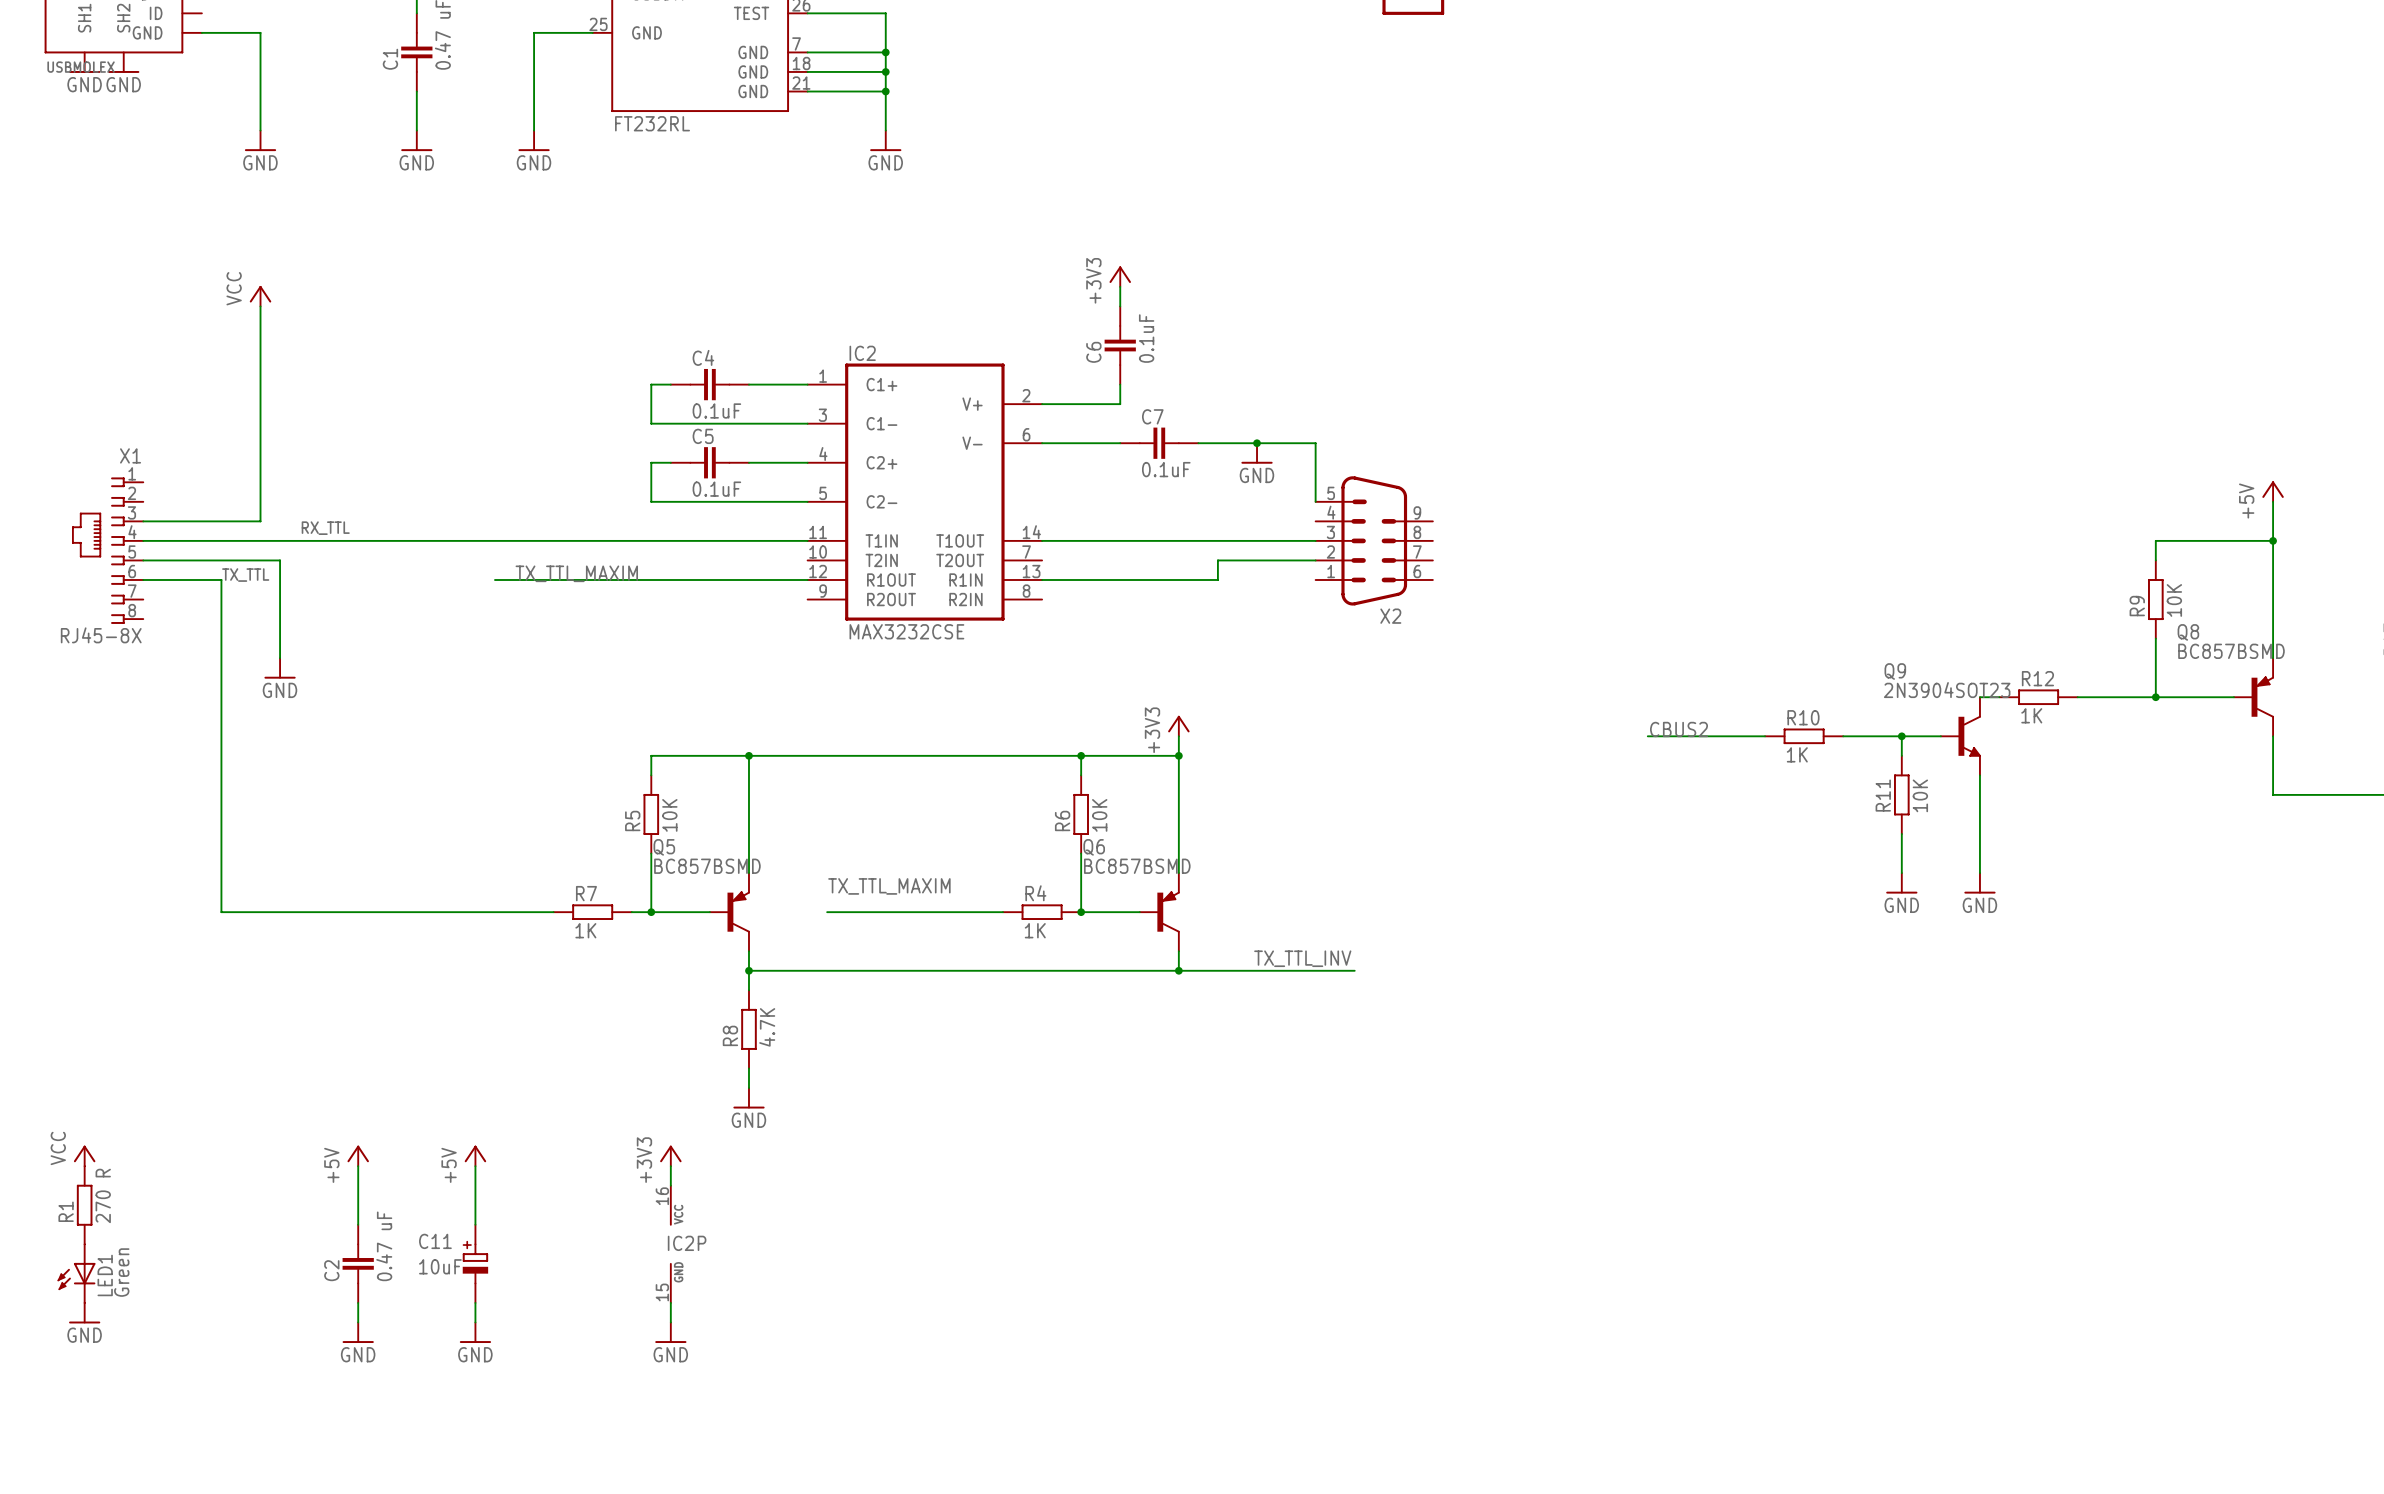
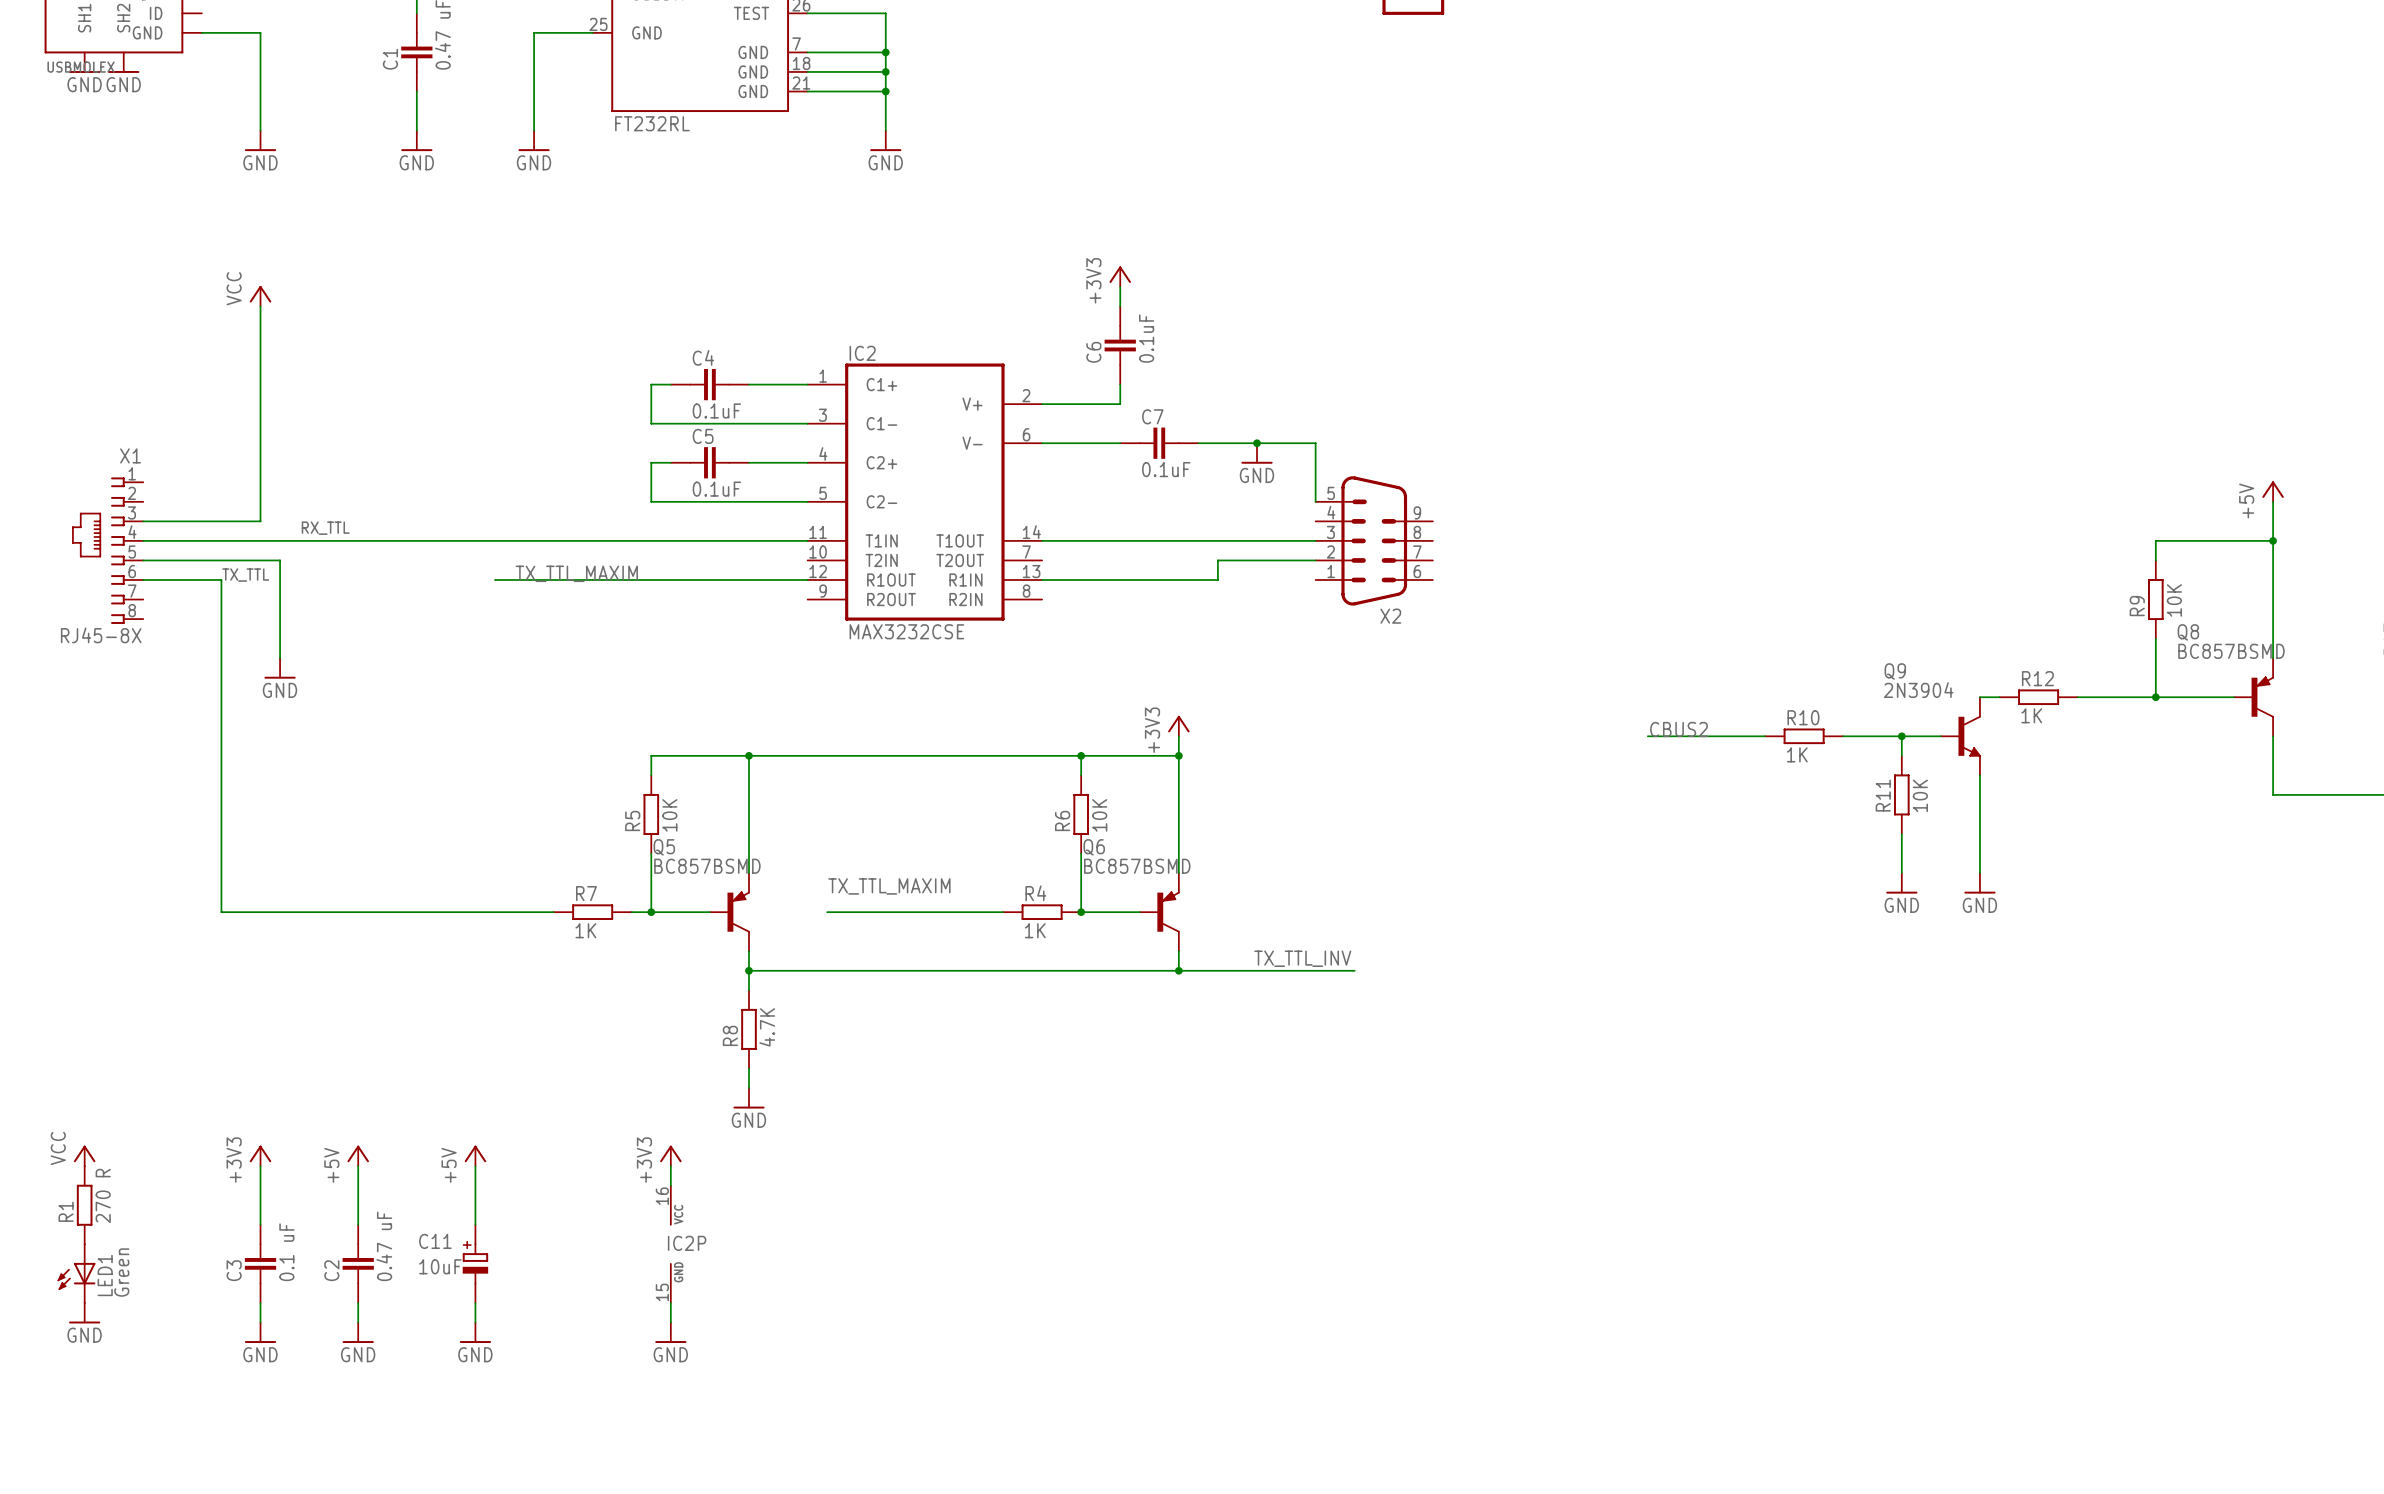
Q9 value: 2N3904SOT23 (1947, 690) -> 2N3904 (1918, 690)
power symbol: none -> +3V3 (260, 1155)
wire: none -> (260, 1166) (260, 1224)
C3: none -> 0.1 uF (260, 1263)
wire: none -> (260, 1302) (260, 1322)
power symbol: none -> GND (260, 1332)

